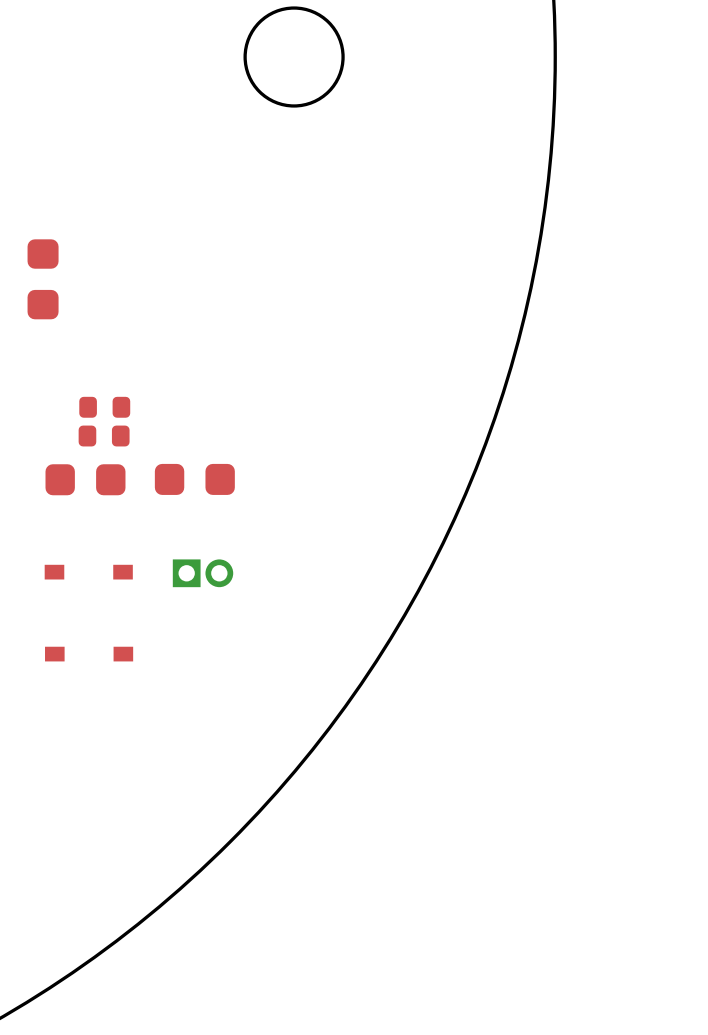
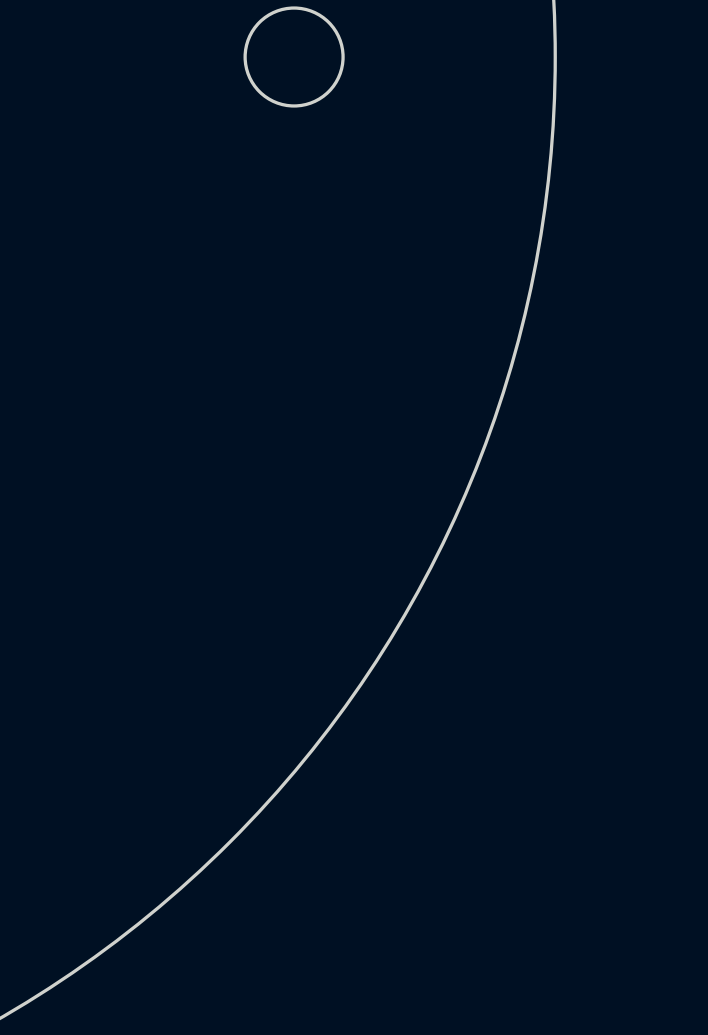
part: (43, 279) -> none
part: (104, 407) -> none
part: (104, 436) -> none
part: (85, 479) -> none
part: (194, 479) -> none
part: (88, 572) -> none
part: (203, 573) -> none
part: (89, 654) -> none

